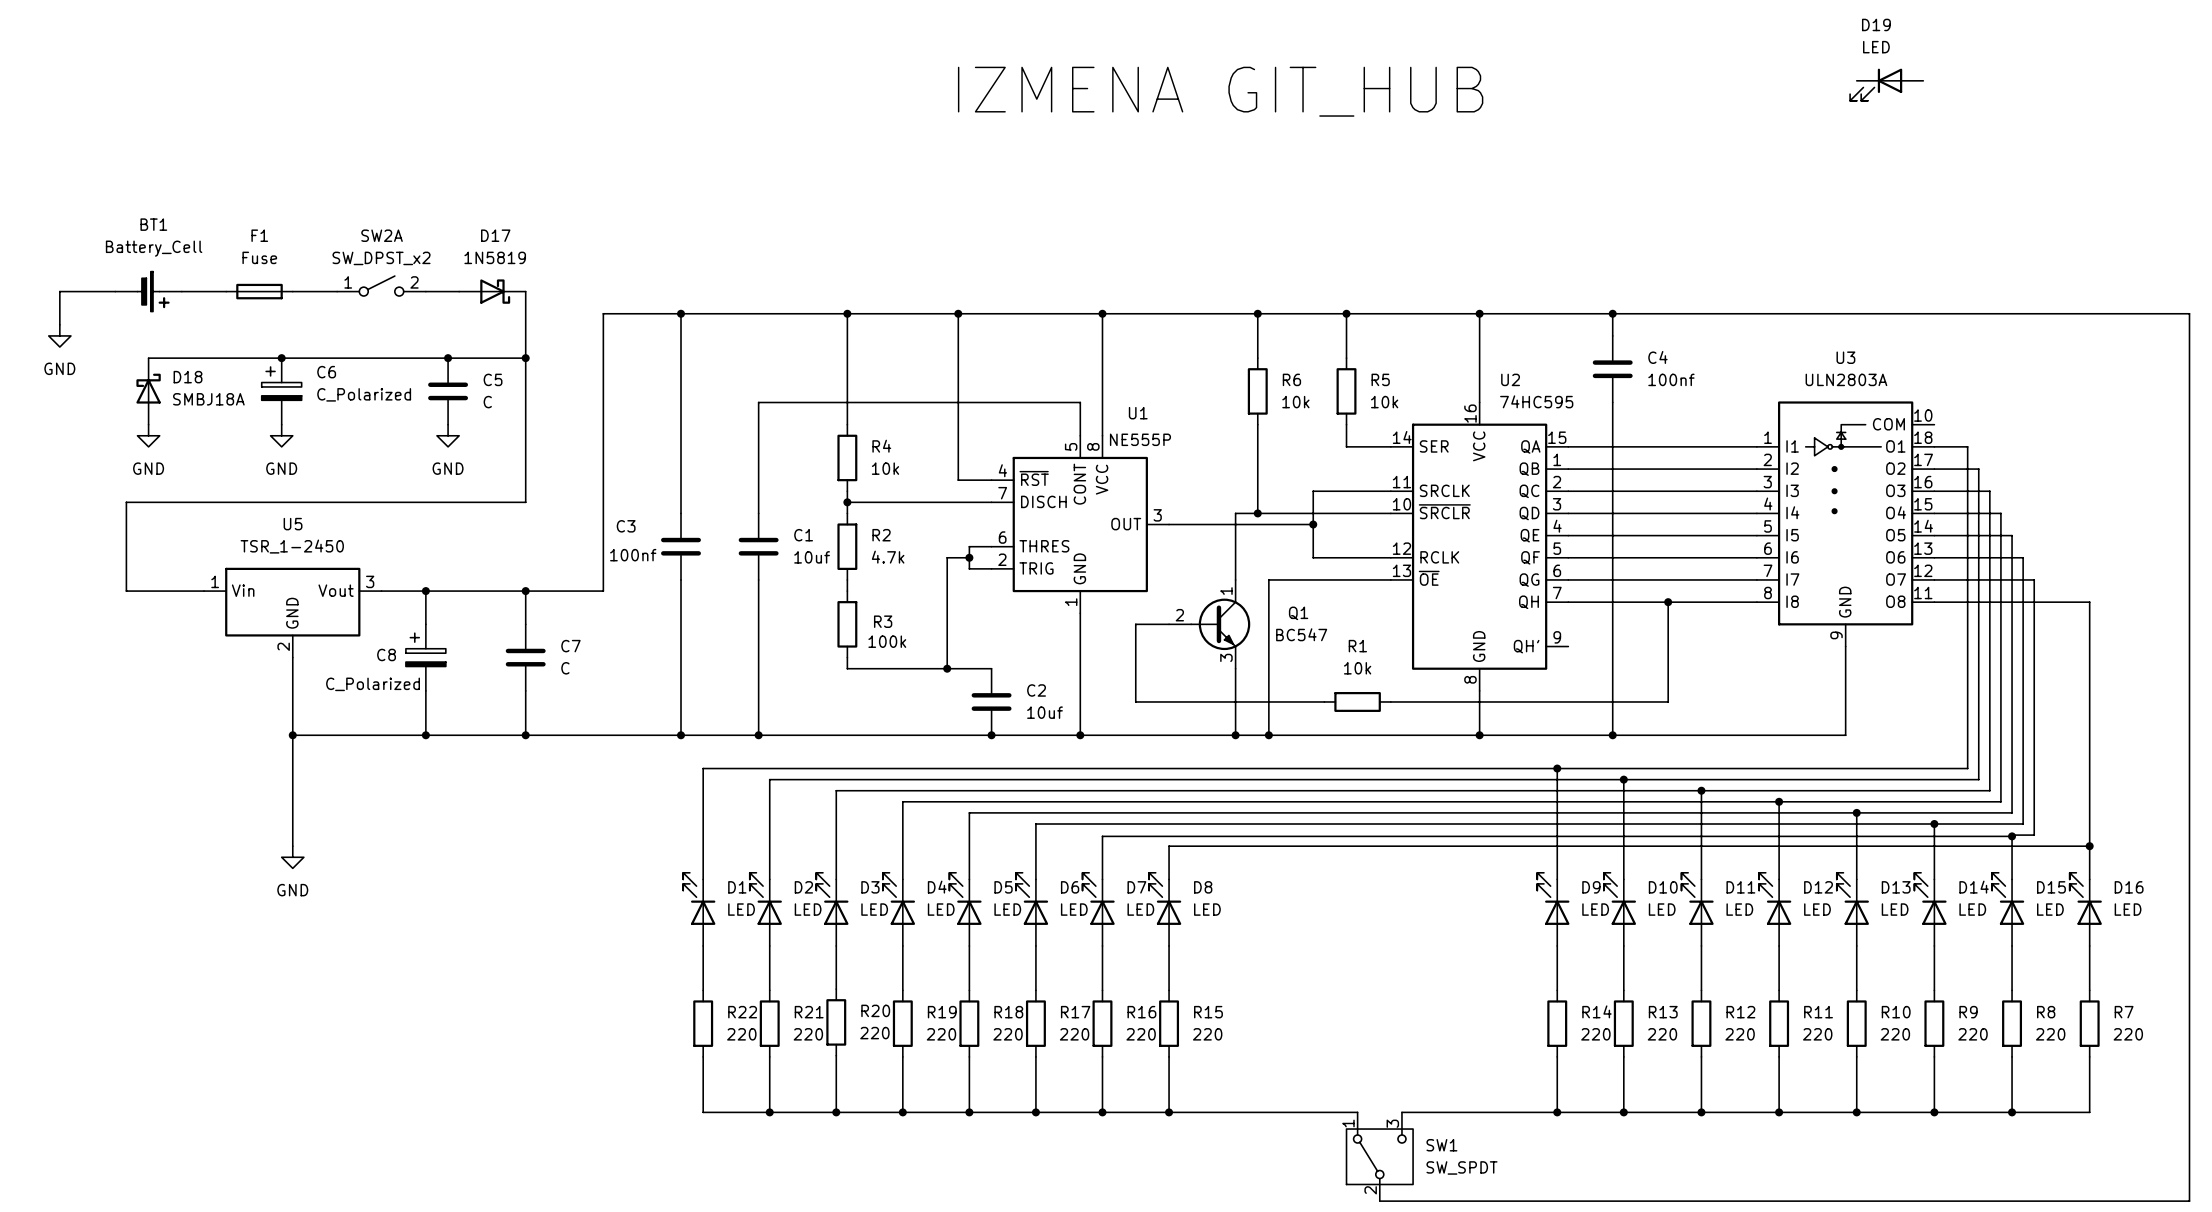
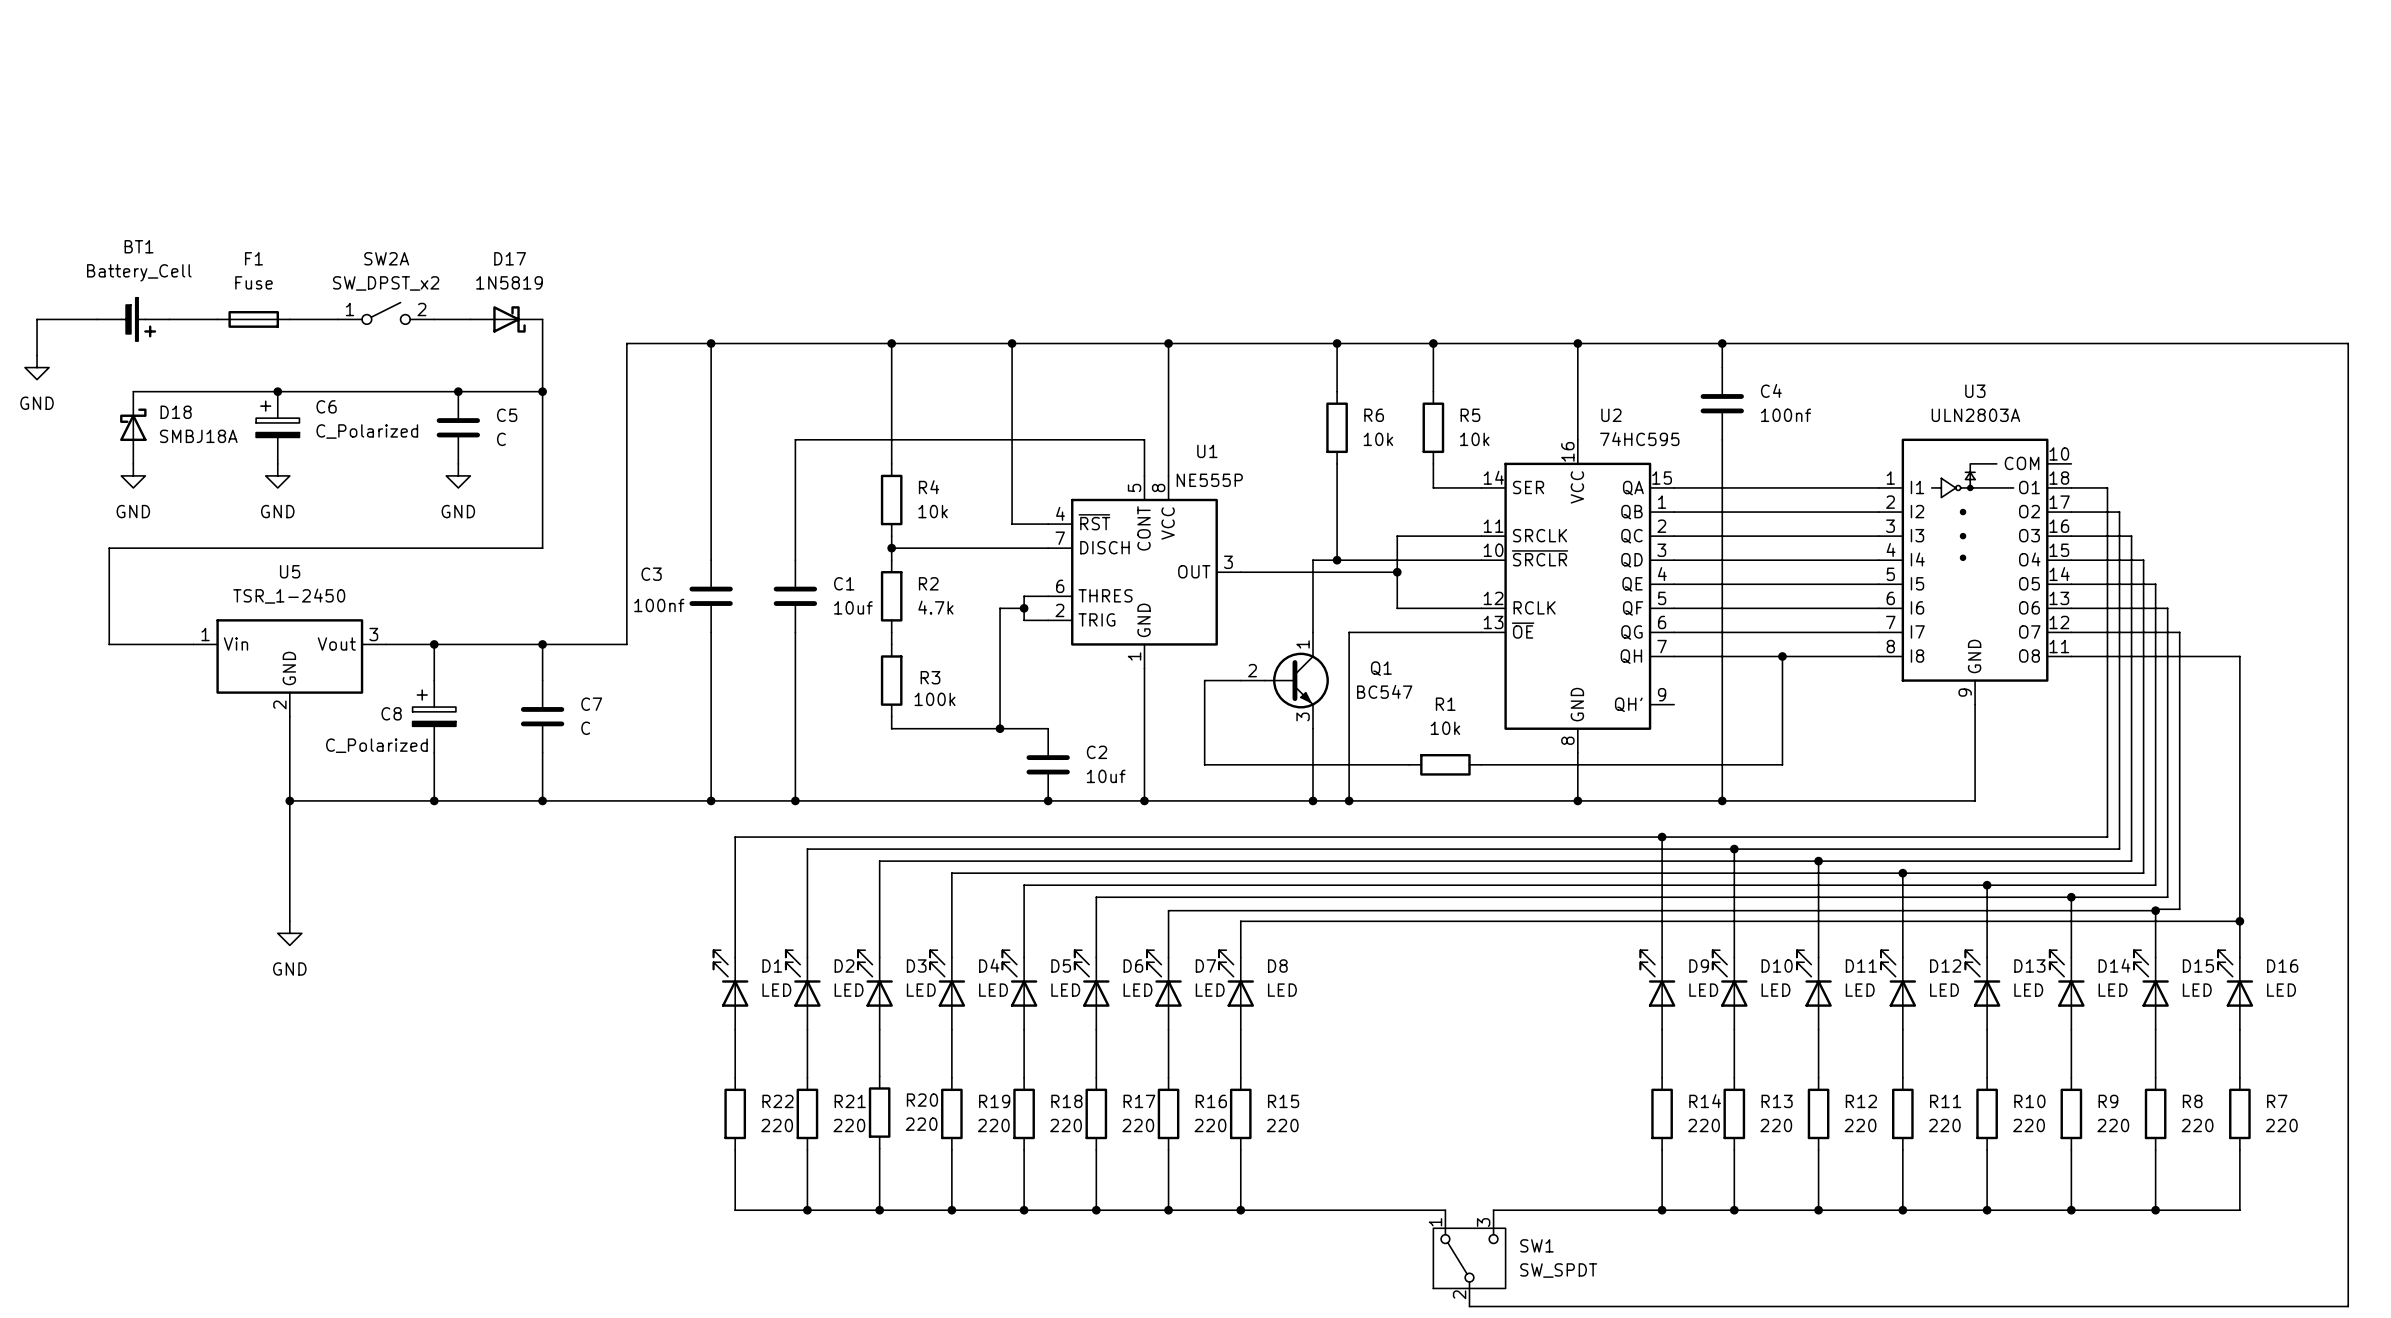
D19: LED (1886, 84) -> none
label: IZMENA GIT_HUB (1220, 91) -> none

